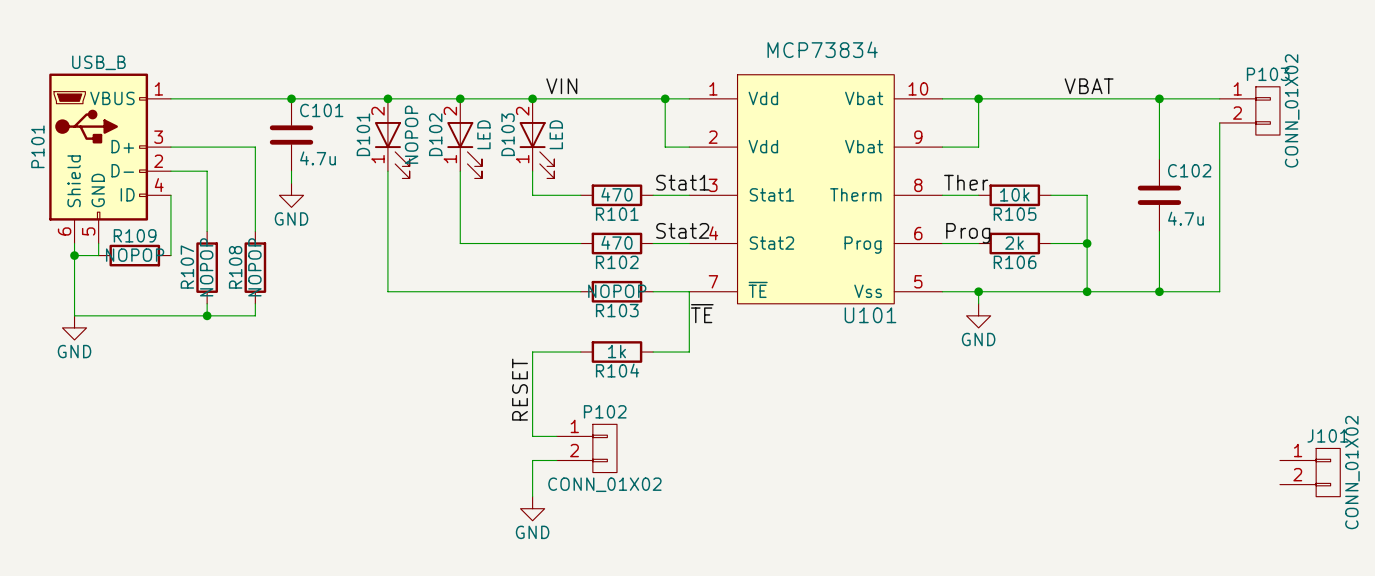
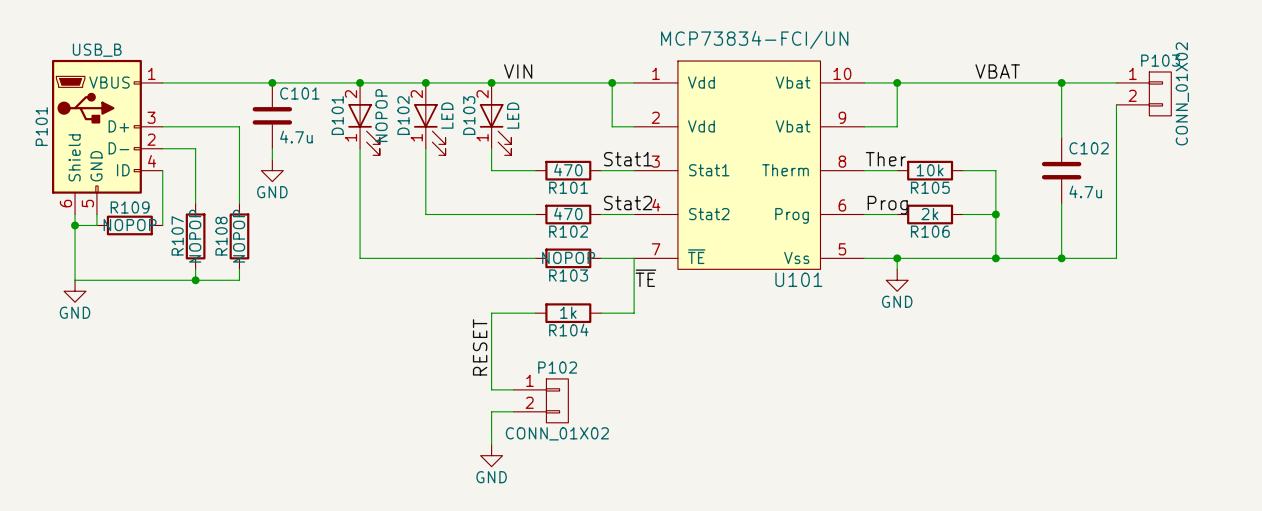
U101 value: MCP73834 (822, 49) -> MCP73834-FCI/UN (754, 39)
J101: CONN_01X02 (1310, 472) -> none

